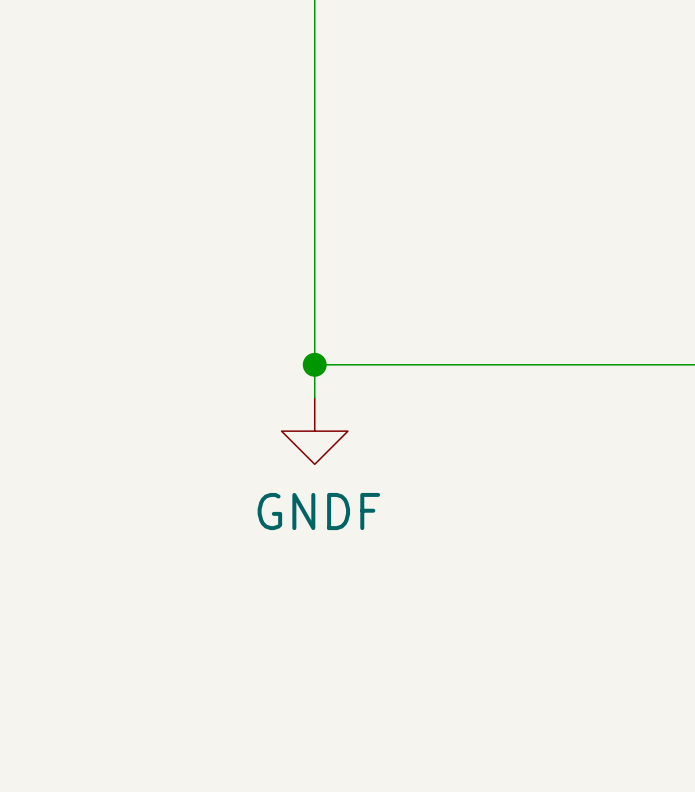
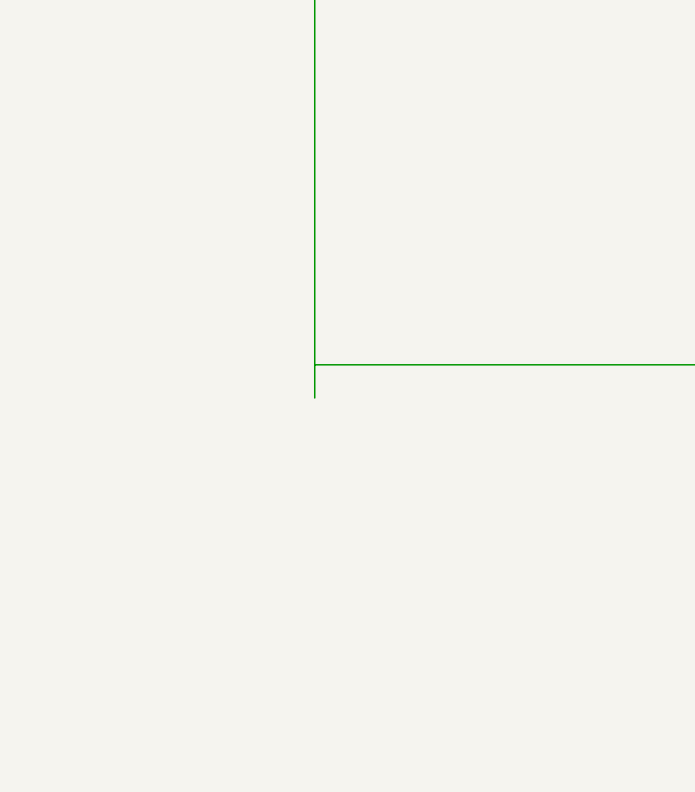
junction: (314, 364) -> none
power symbol: GNDF (314, 431) -> none

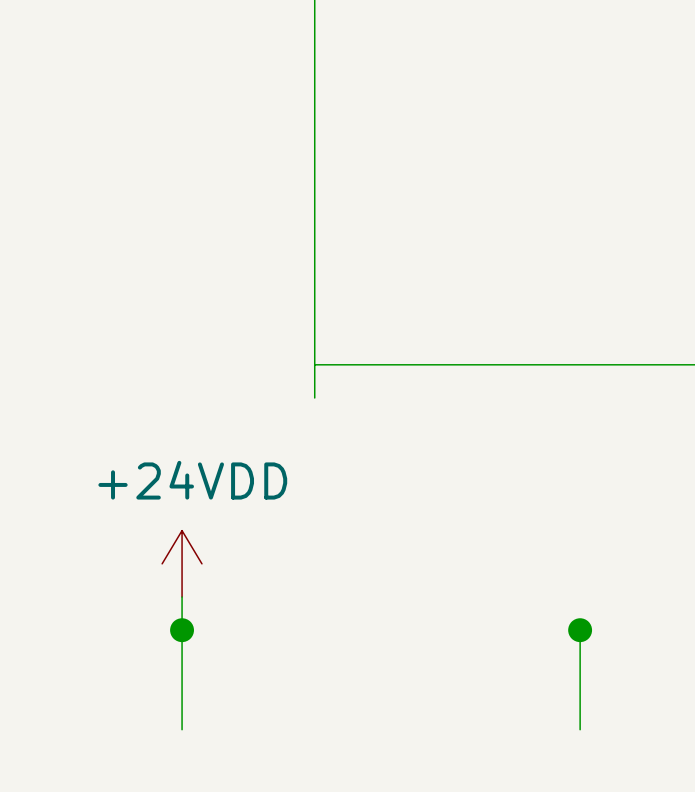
power symbol: none -> +24VDD (182, 563)
wire: none -> (182, 597) (182, 729)
junction: none -> (182, 630)
wire: none -> (580, 630) (580, 729)
junction: none -> (580, 630)

